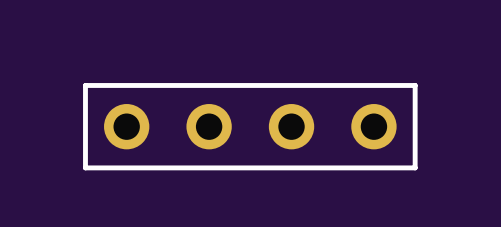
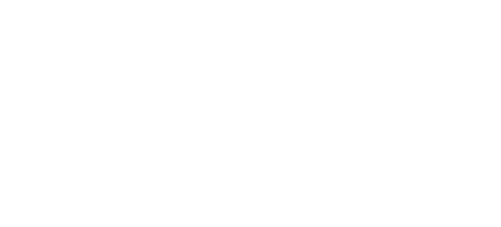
part: (250, 126) -> none

